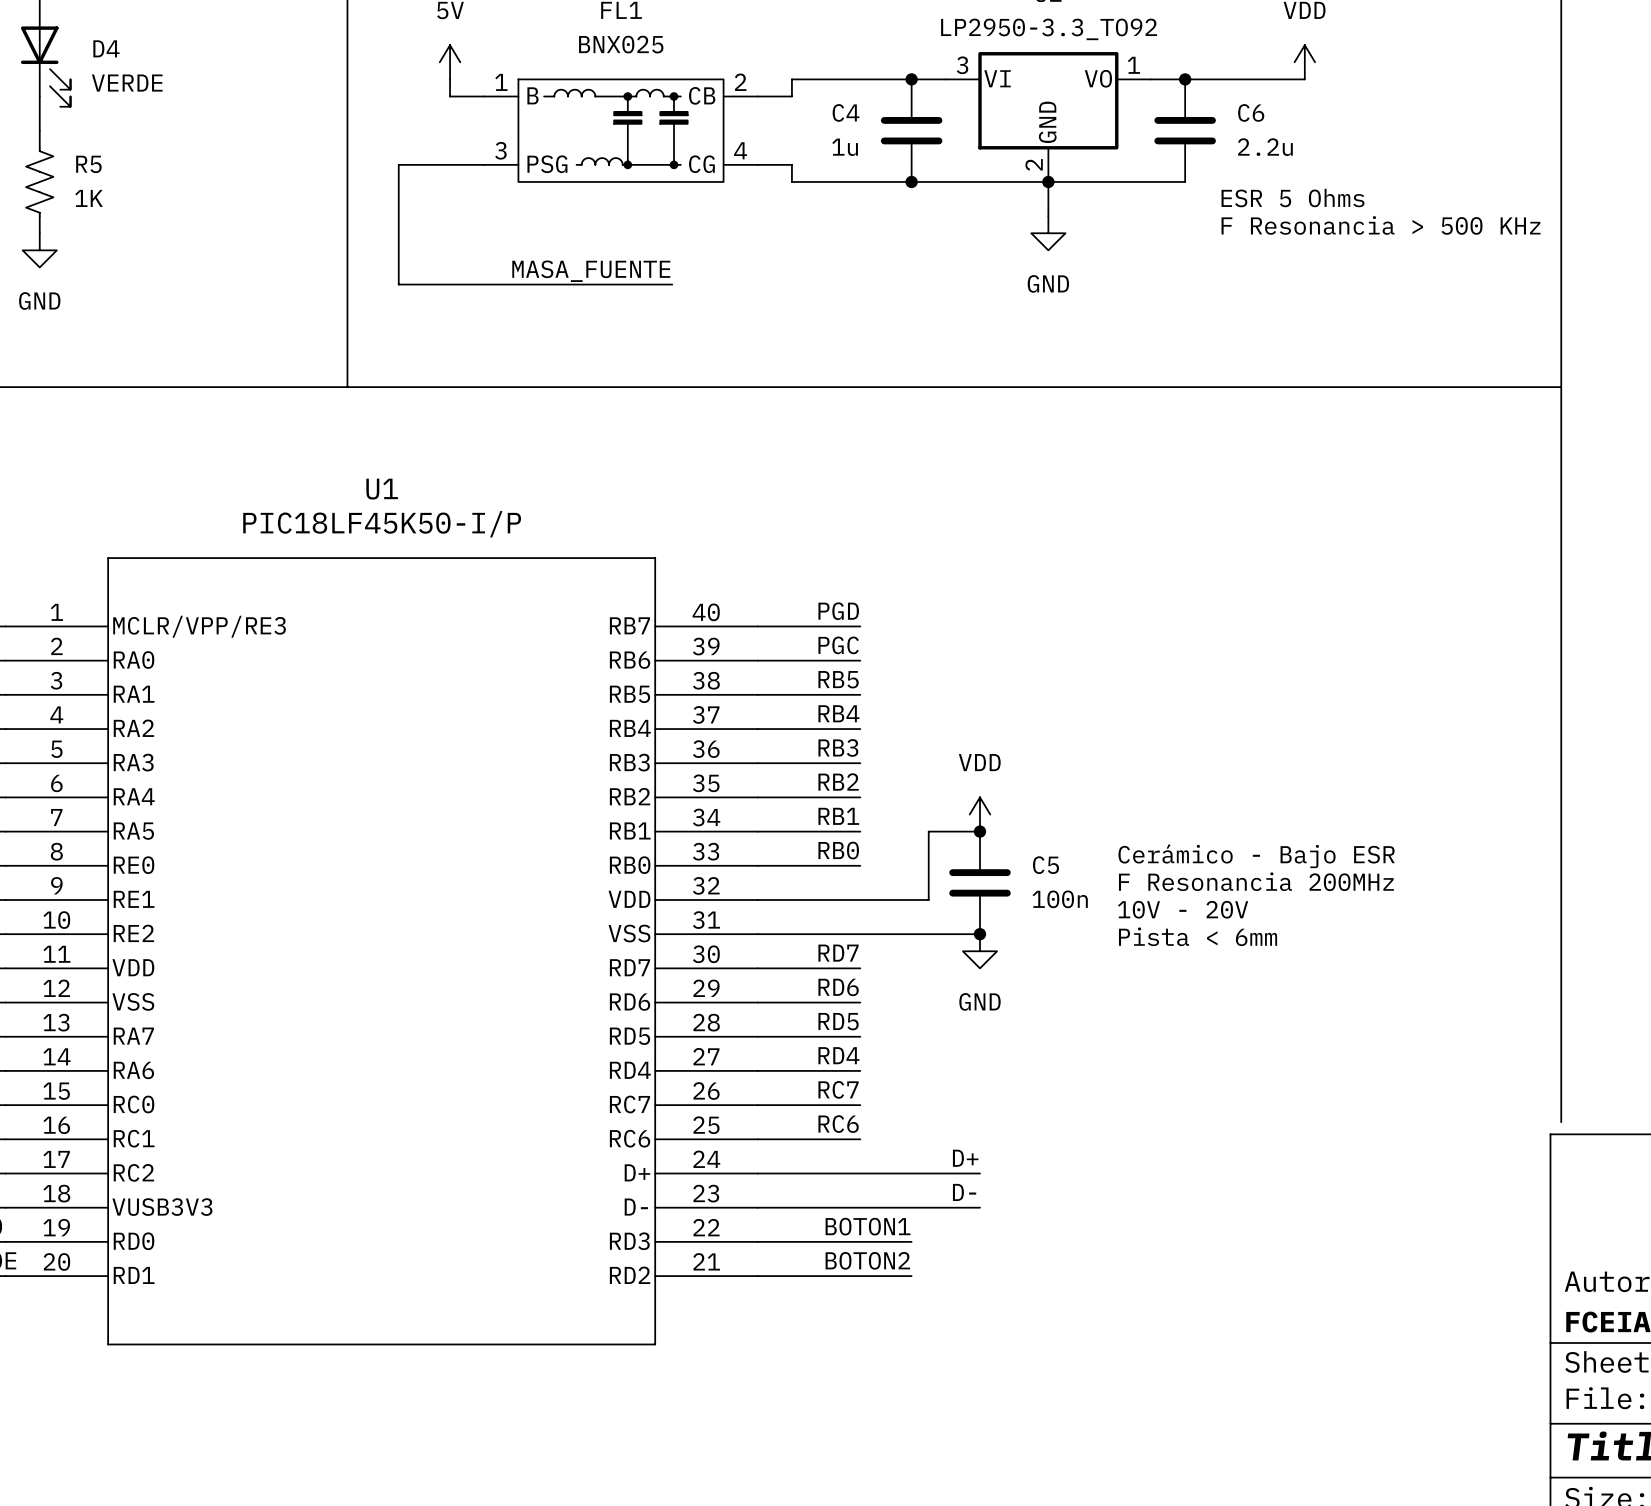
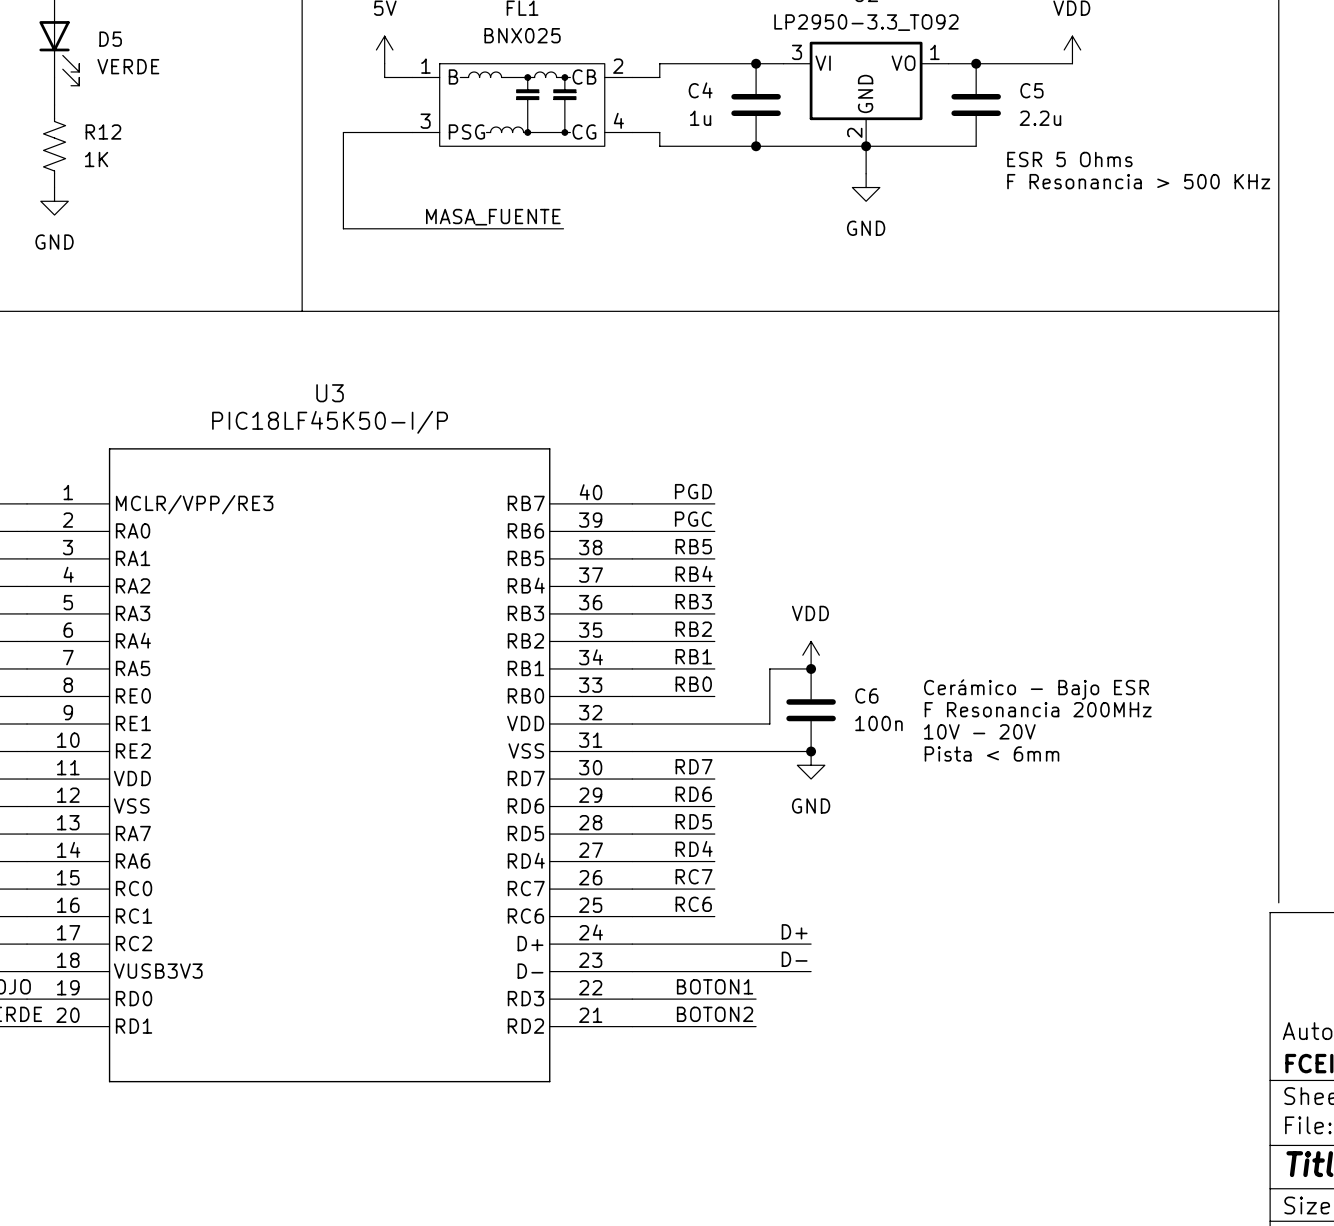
D4 name: D4 (106, 48) -> D5 (110, 39)
C6 name: C6 (1251, 112) -> C5 (1031, 90)
R5 name: R5 (88, 164) -> R12 (103, 131)
U1 name: U1 (382, 489) -> U3 (330, 393)
C5 name: C5 (1046, 865) -> C6 (866, 695)

